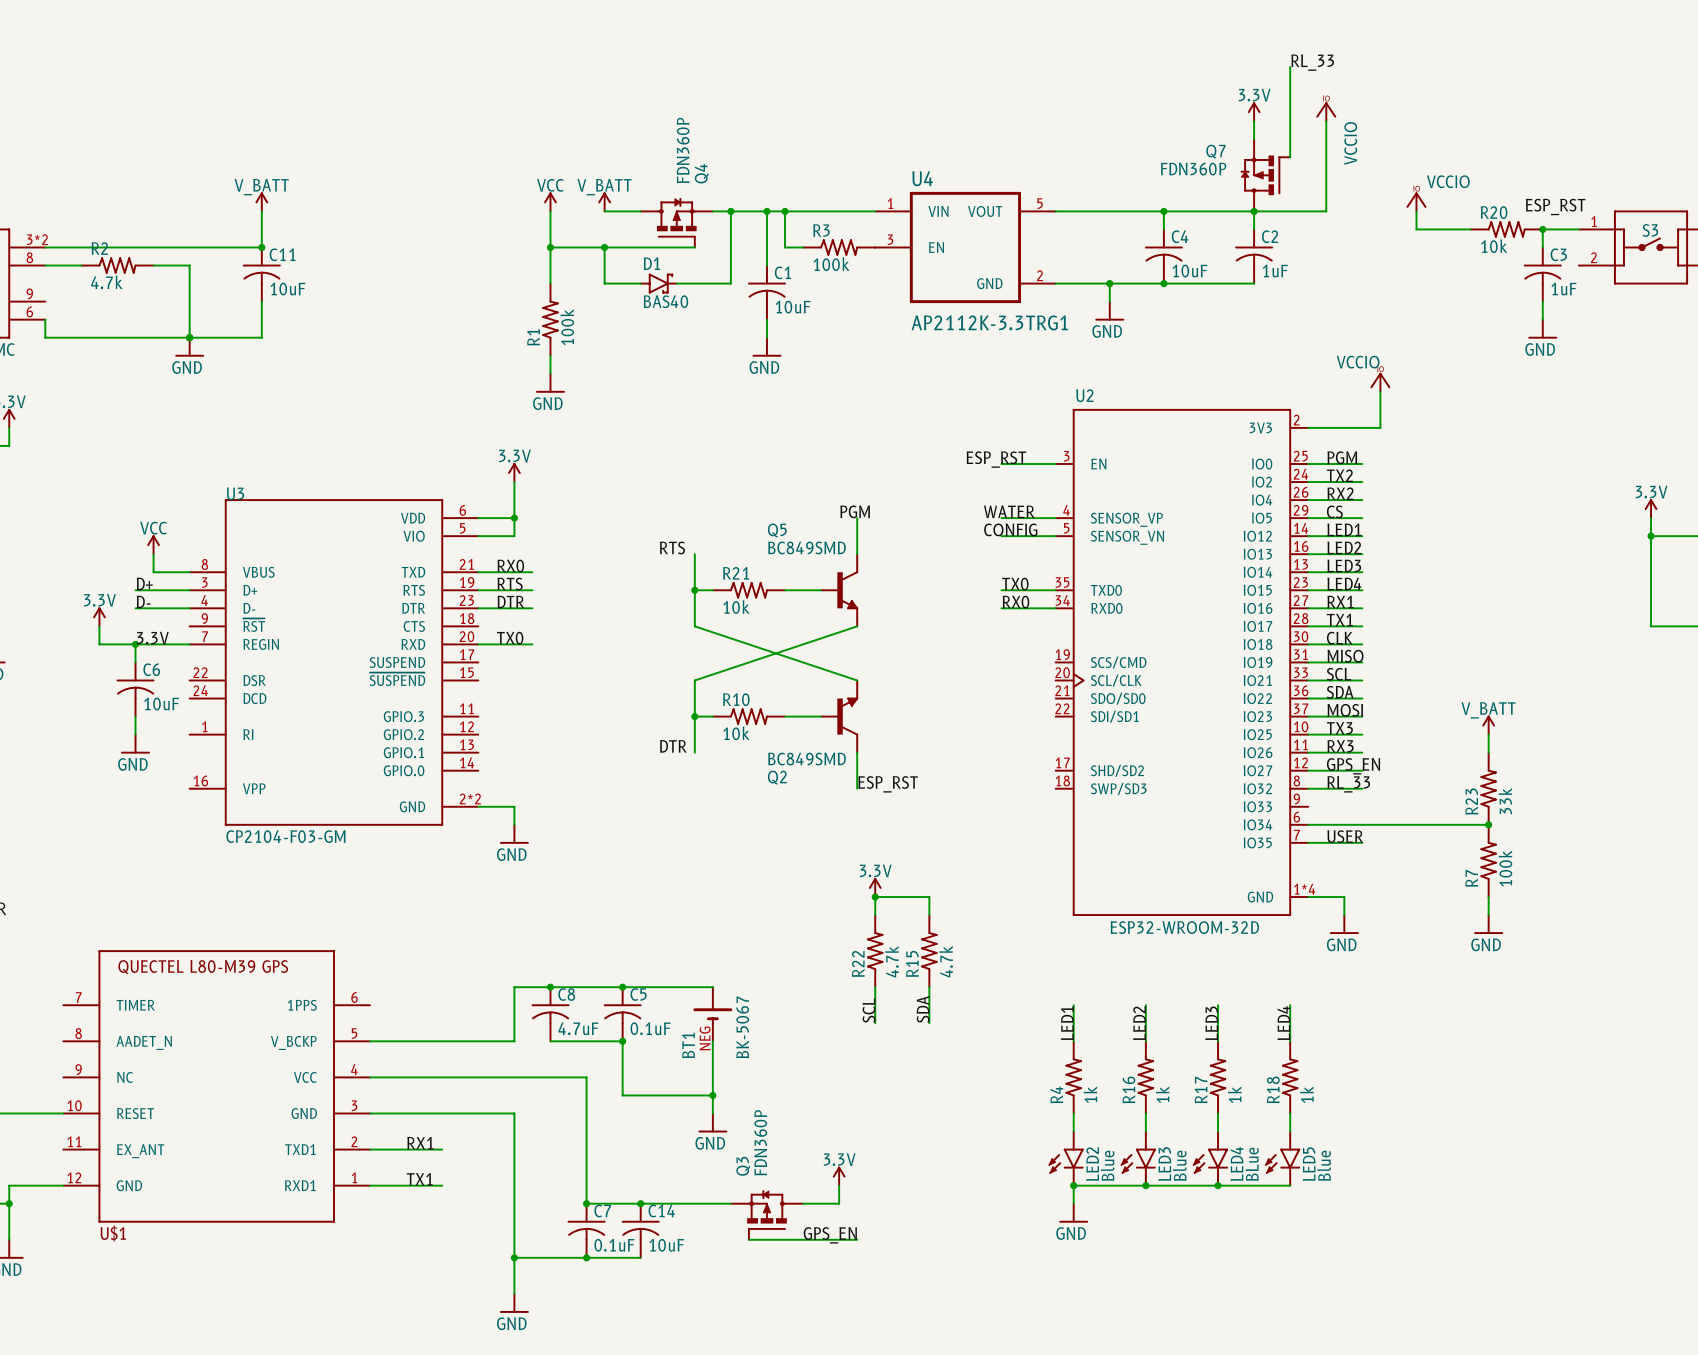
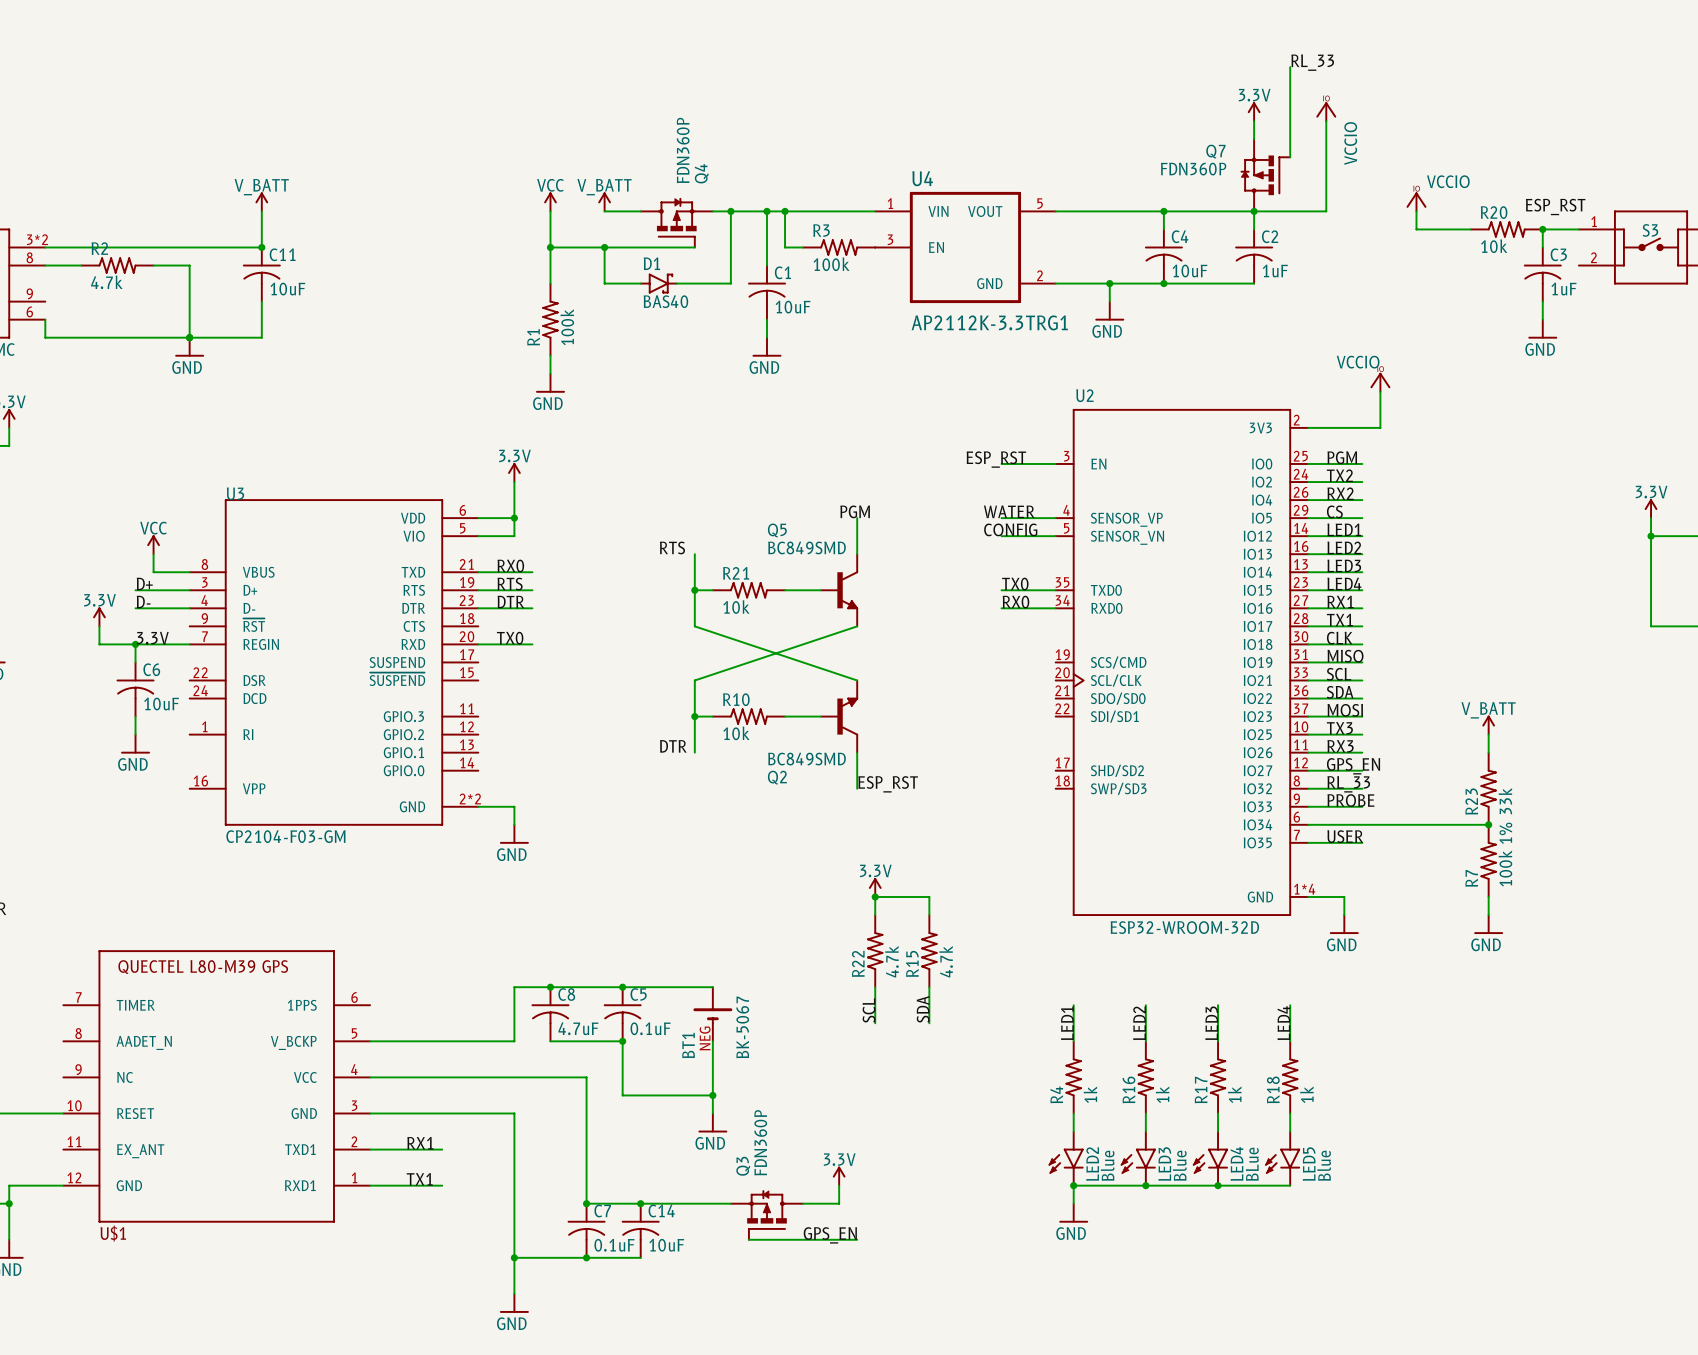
label: none -> PROBE (1350, 800)
wire: none -> (1308, 806) (1362, 806)
R7 value: 100k (1505, 868) -> 100k 1% (1505, 854)

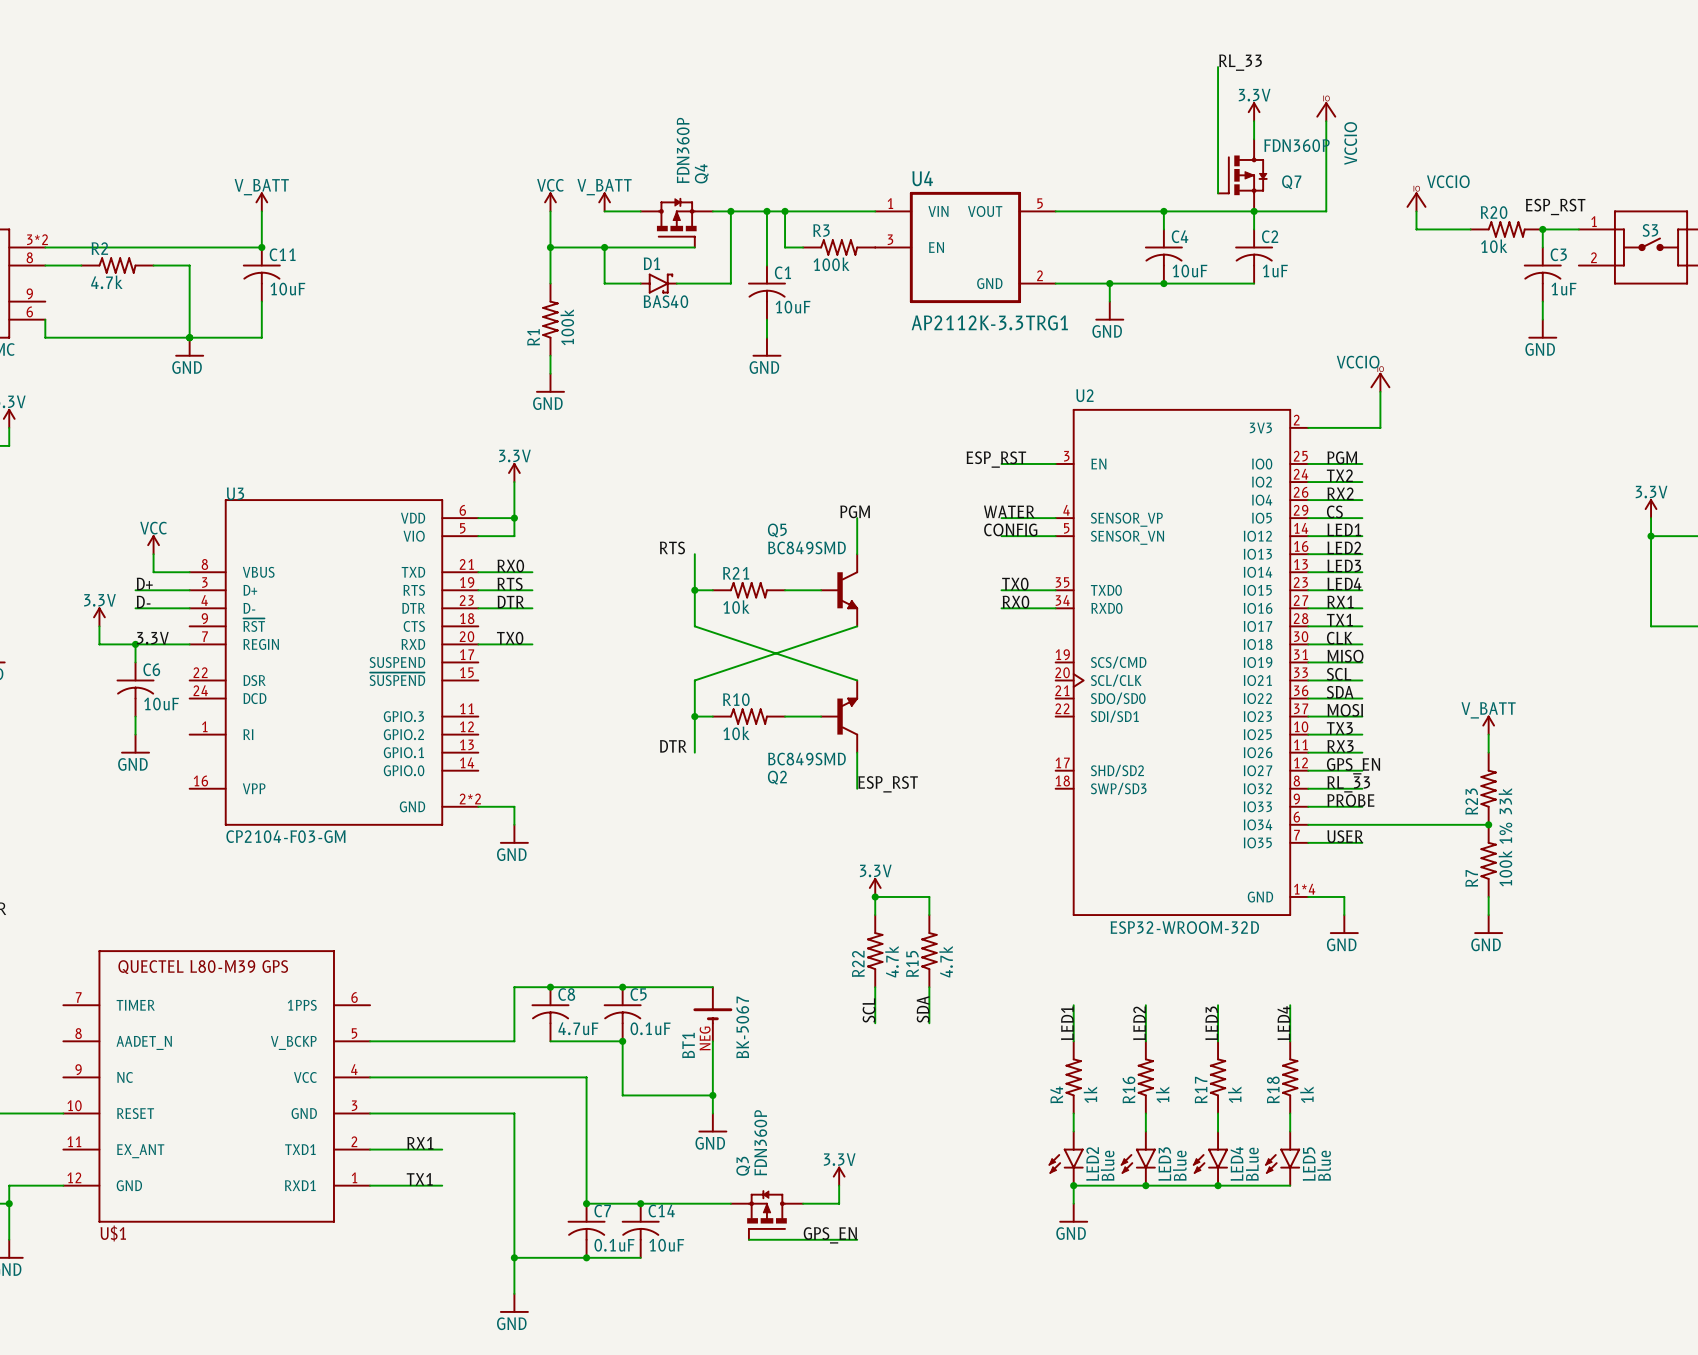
label position: RL_33 (1312, 62) -> RL_33 (1240, 62)
wire: none -> (1218, 67) (1218, 193)
wire: (1290, 67) (1290, 157) -> none
Q7 name position: Q7 (1215, 151) -> Q7 (1291, 182)
Q7 value position: FDN360P (1193, 169) -> FDN360P (1296, 145)
Q7 rotation: 0° (1265, 175) -> 180° (1242, 175)

